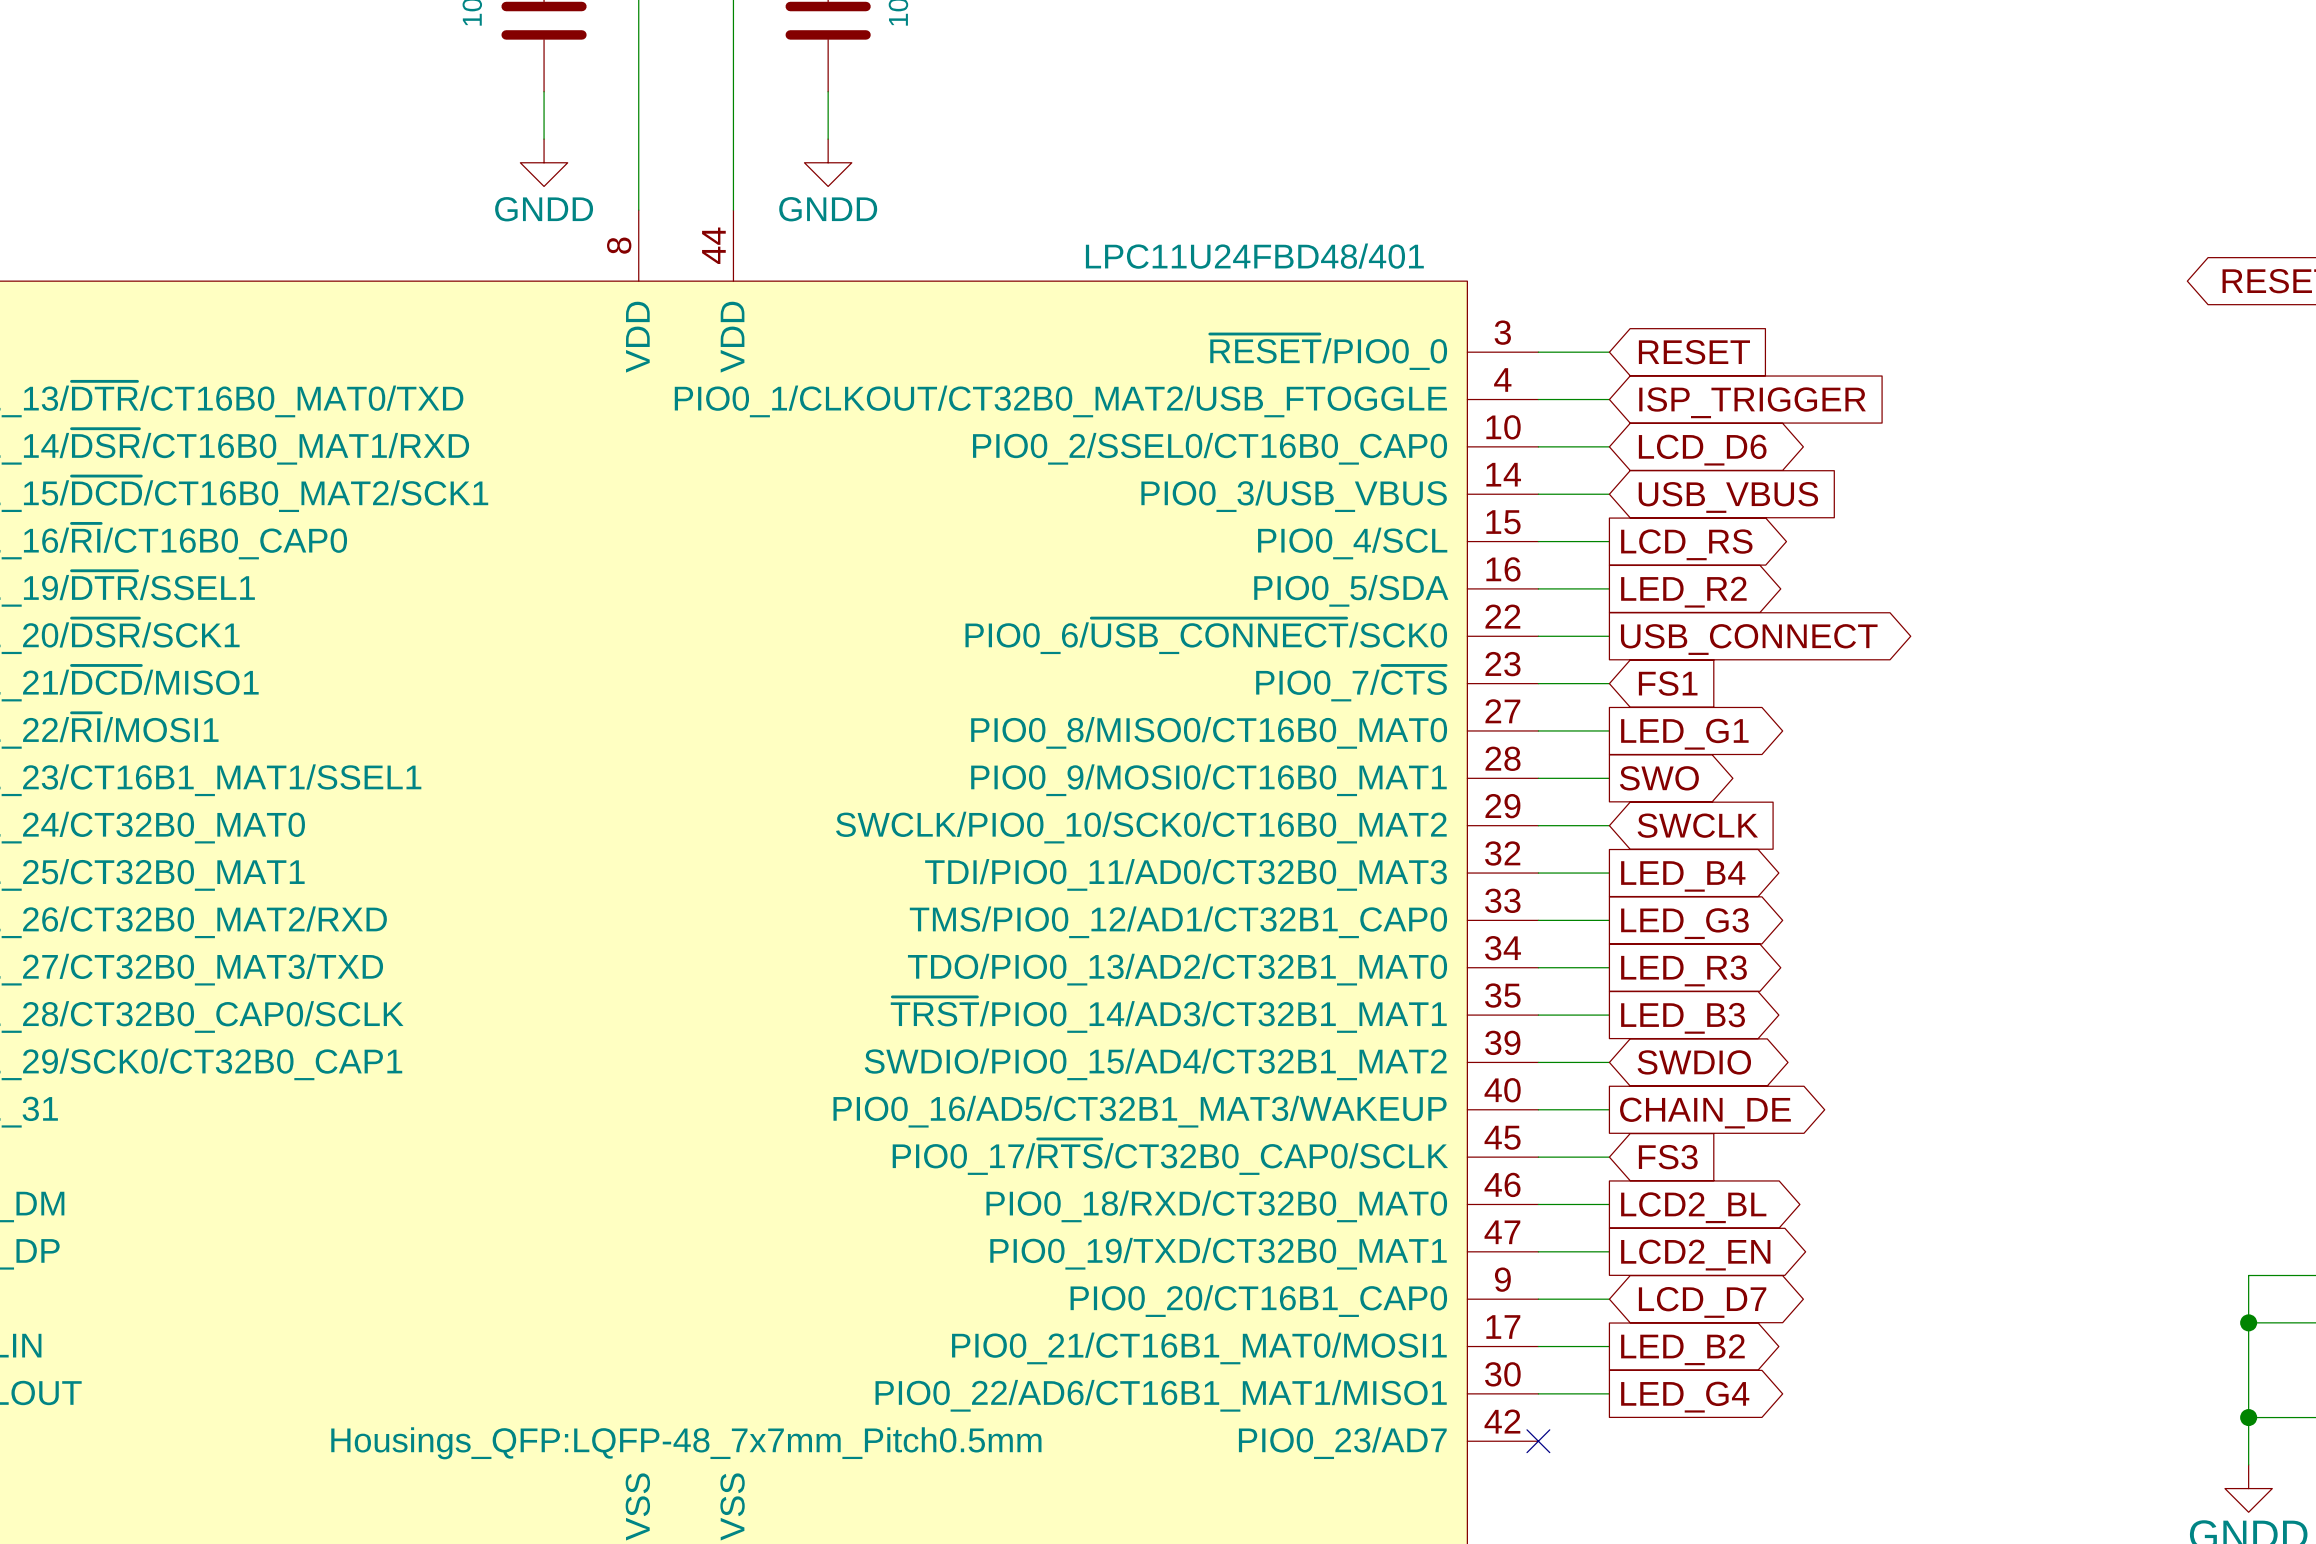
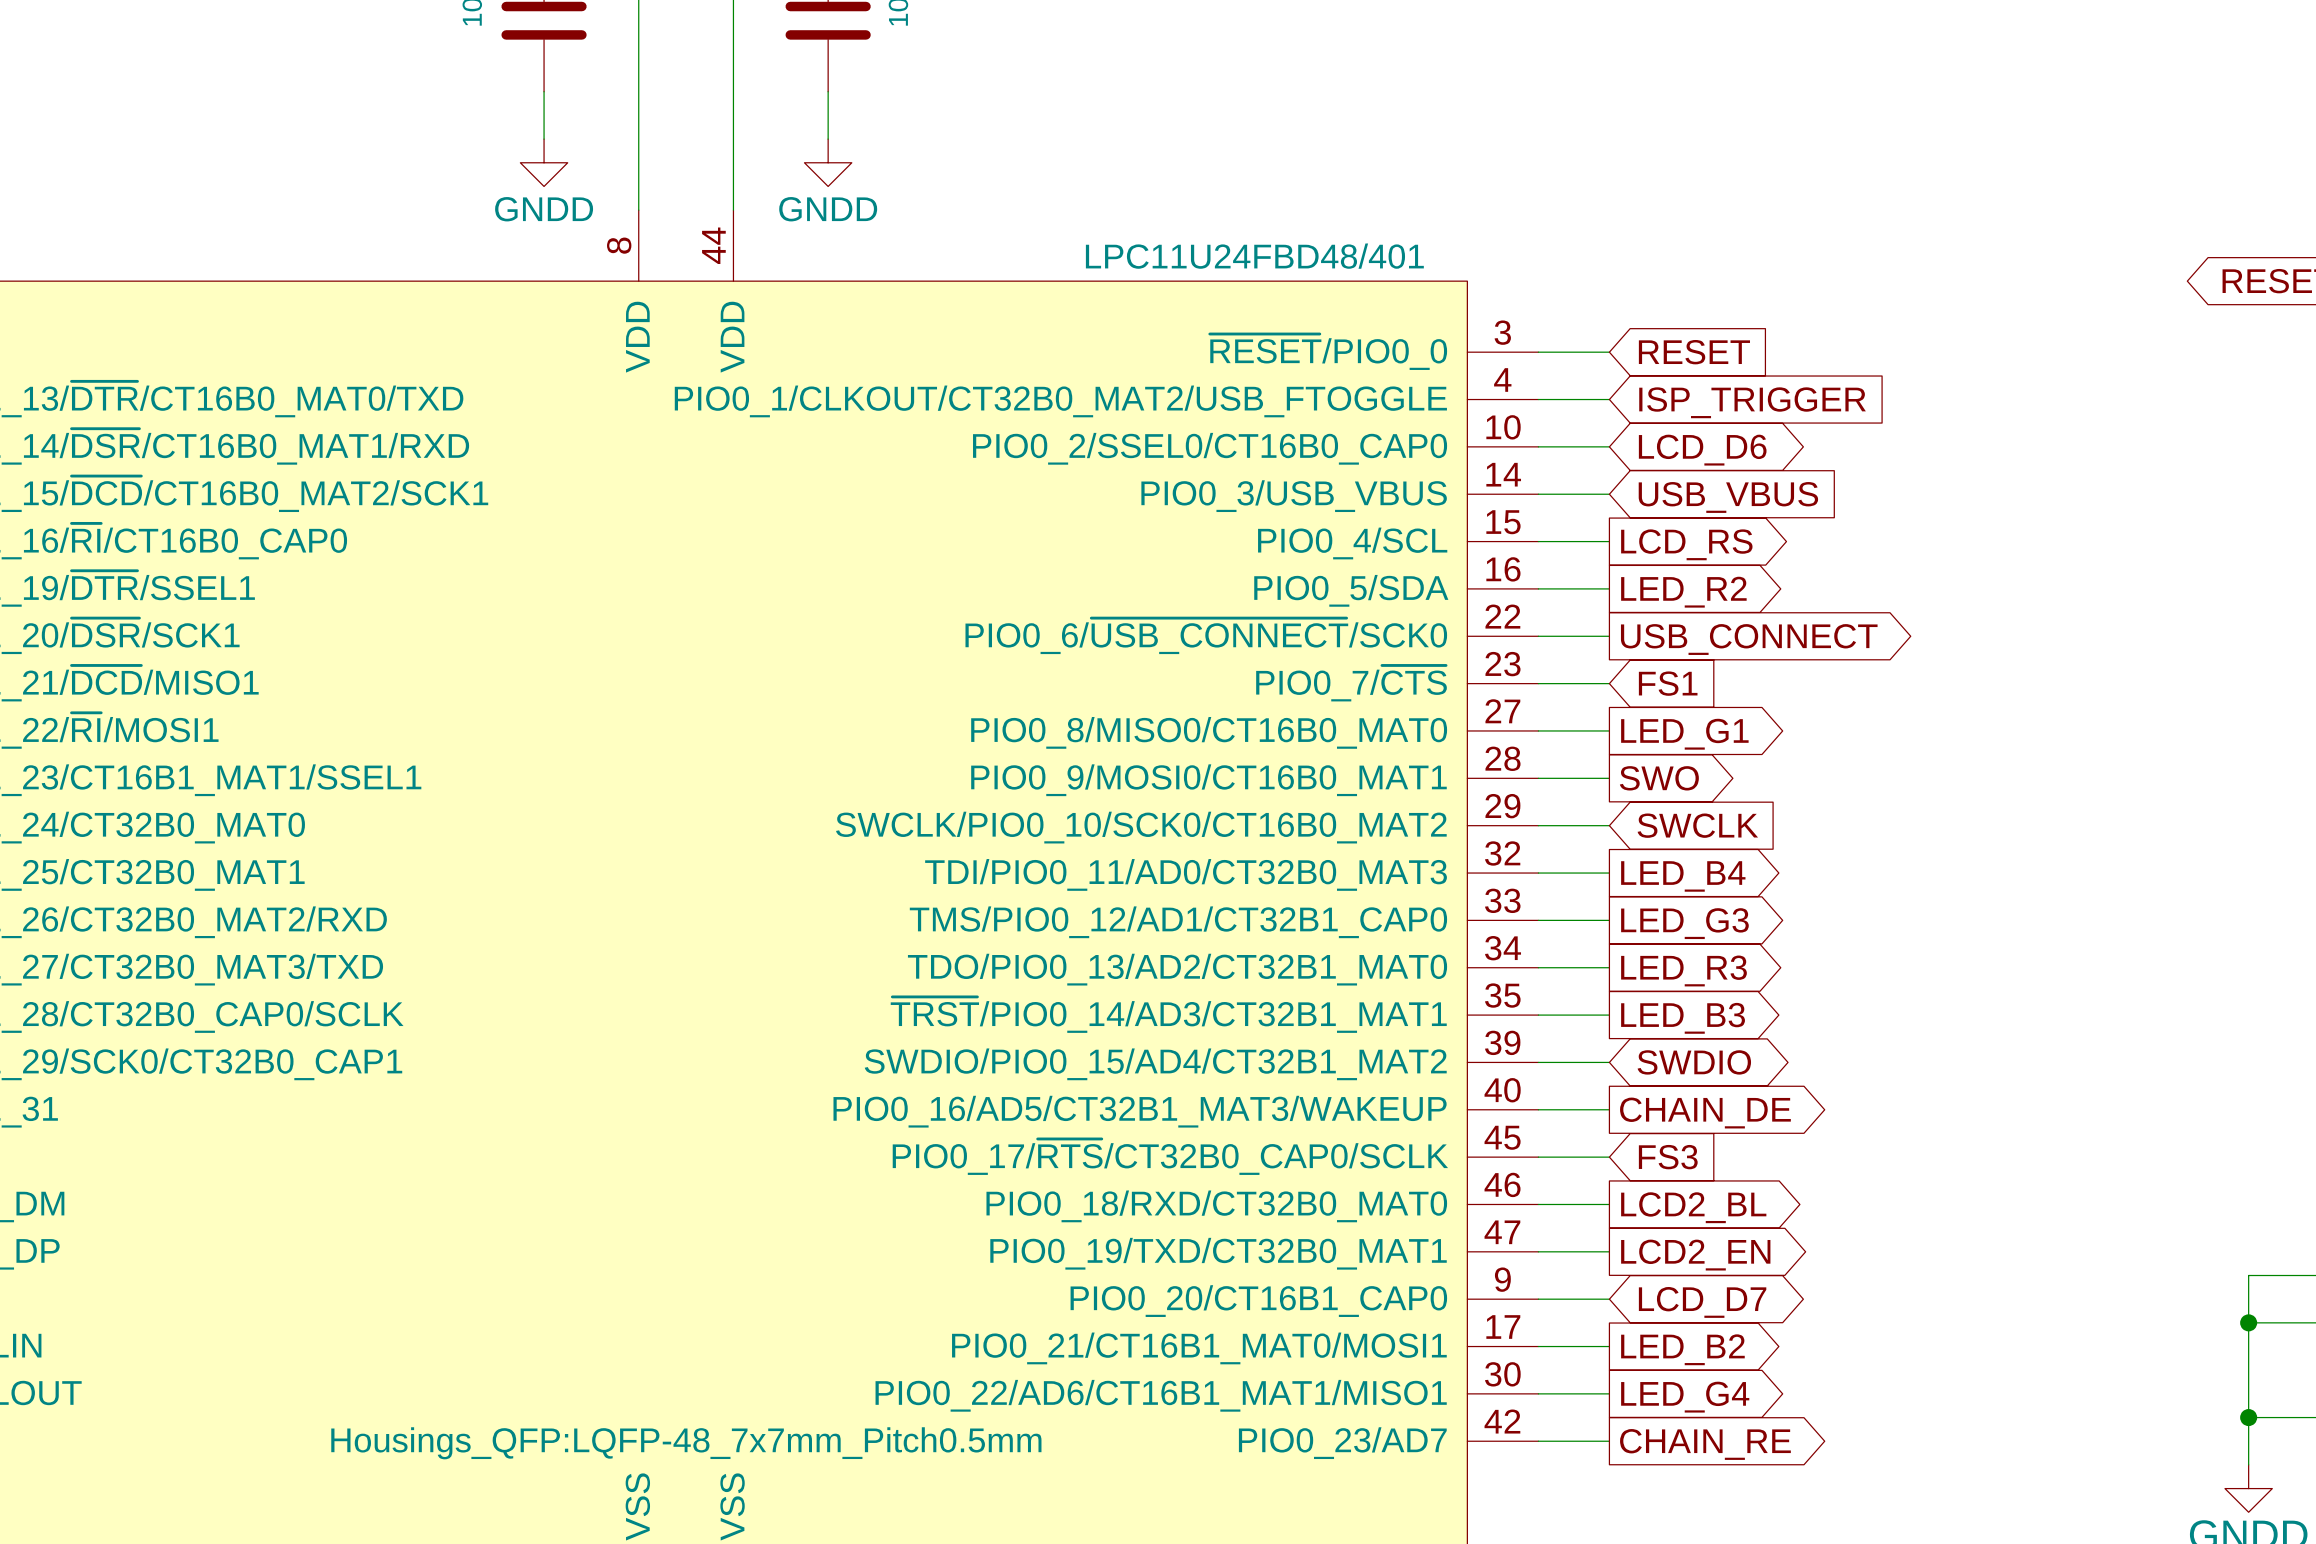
wire: none -> (1538, 1441) (1609, 1441)
no-connect mark: (1538, 1441) -> none
global label: none -> CHAIN_RE (1705, 1444)

